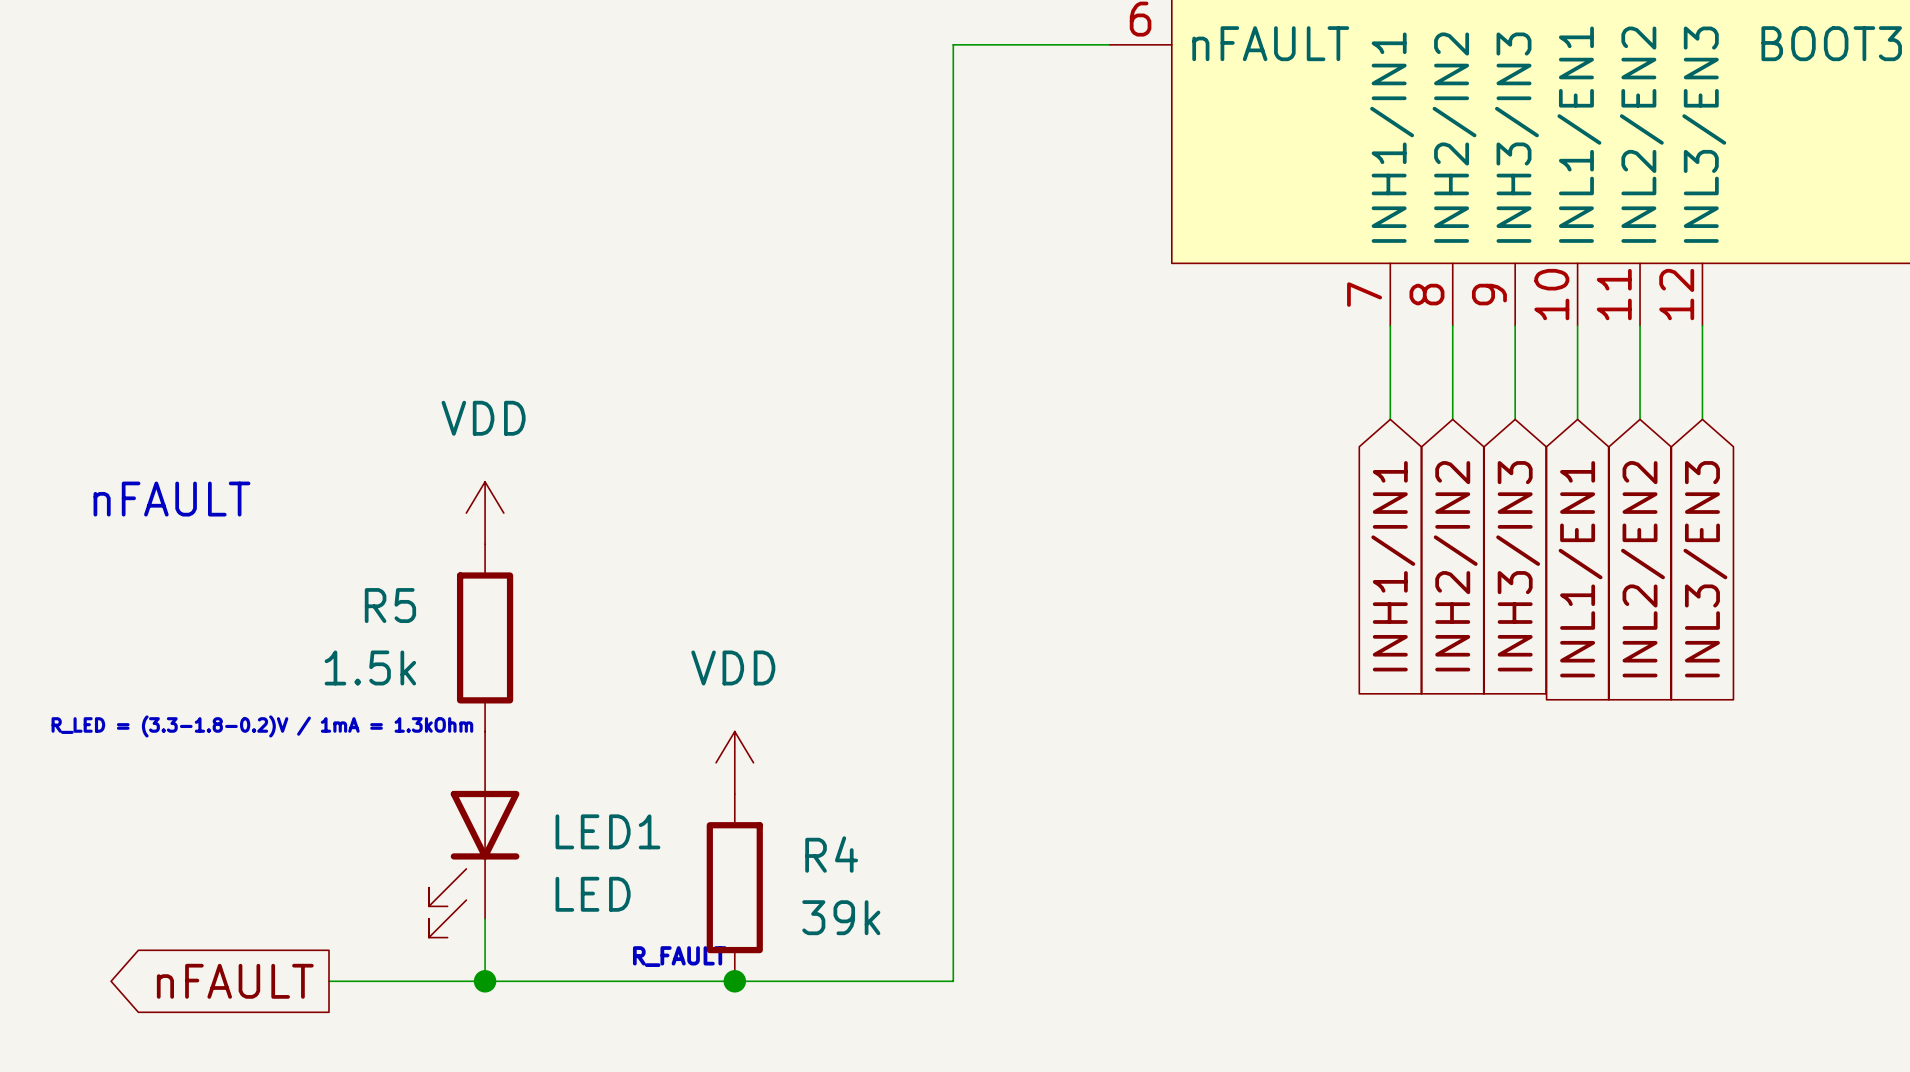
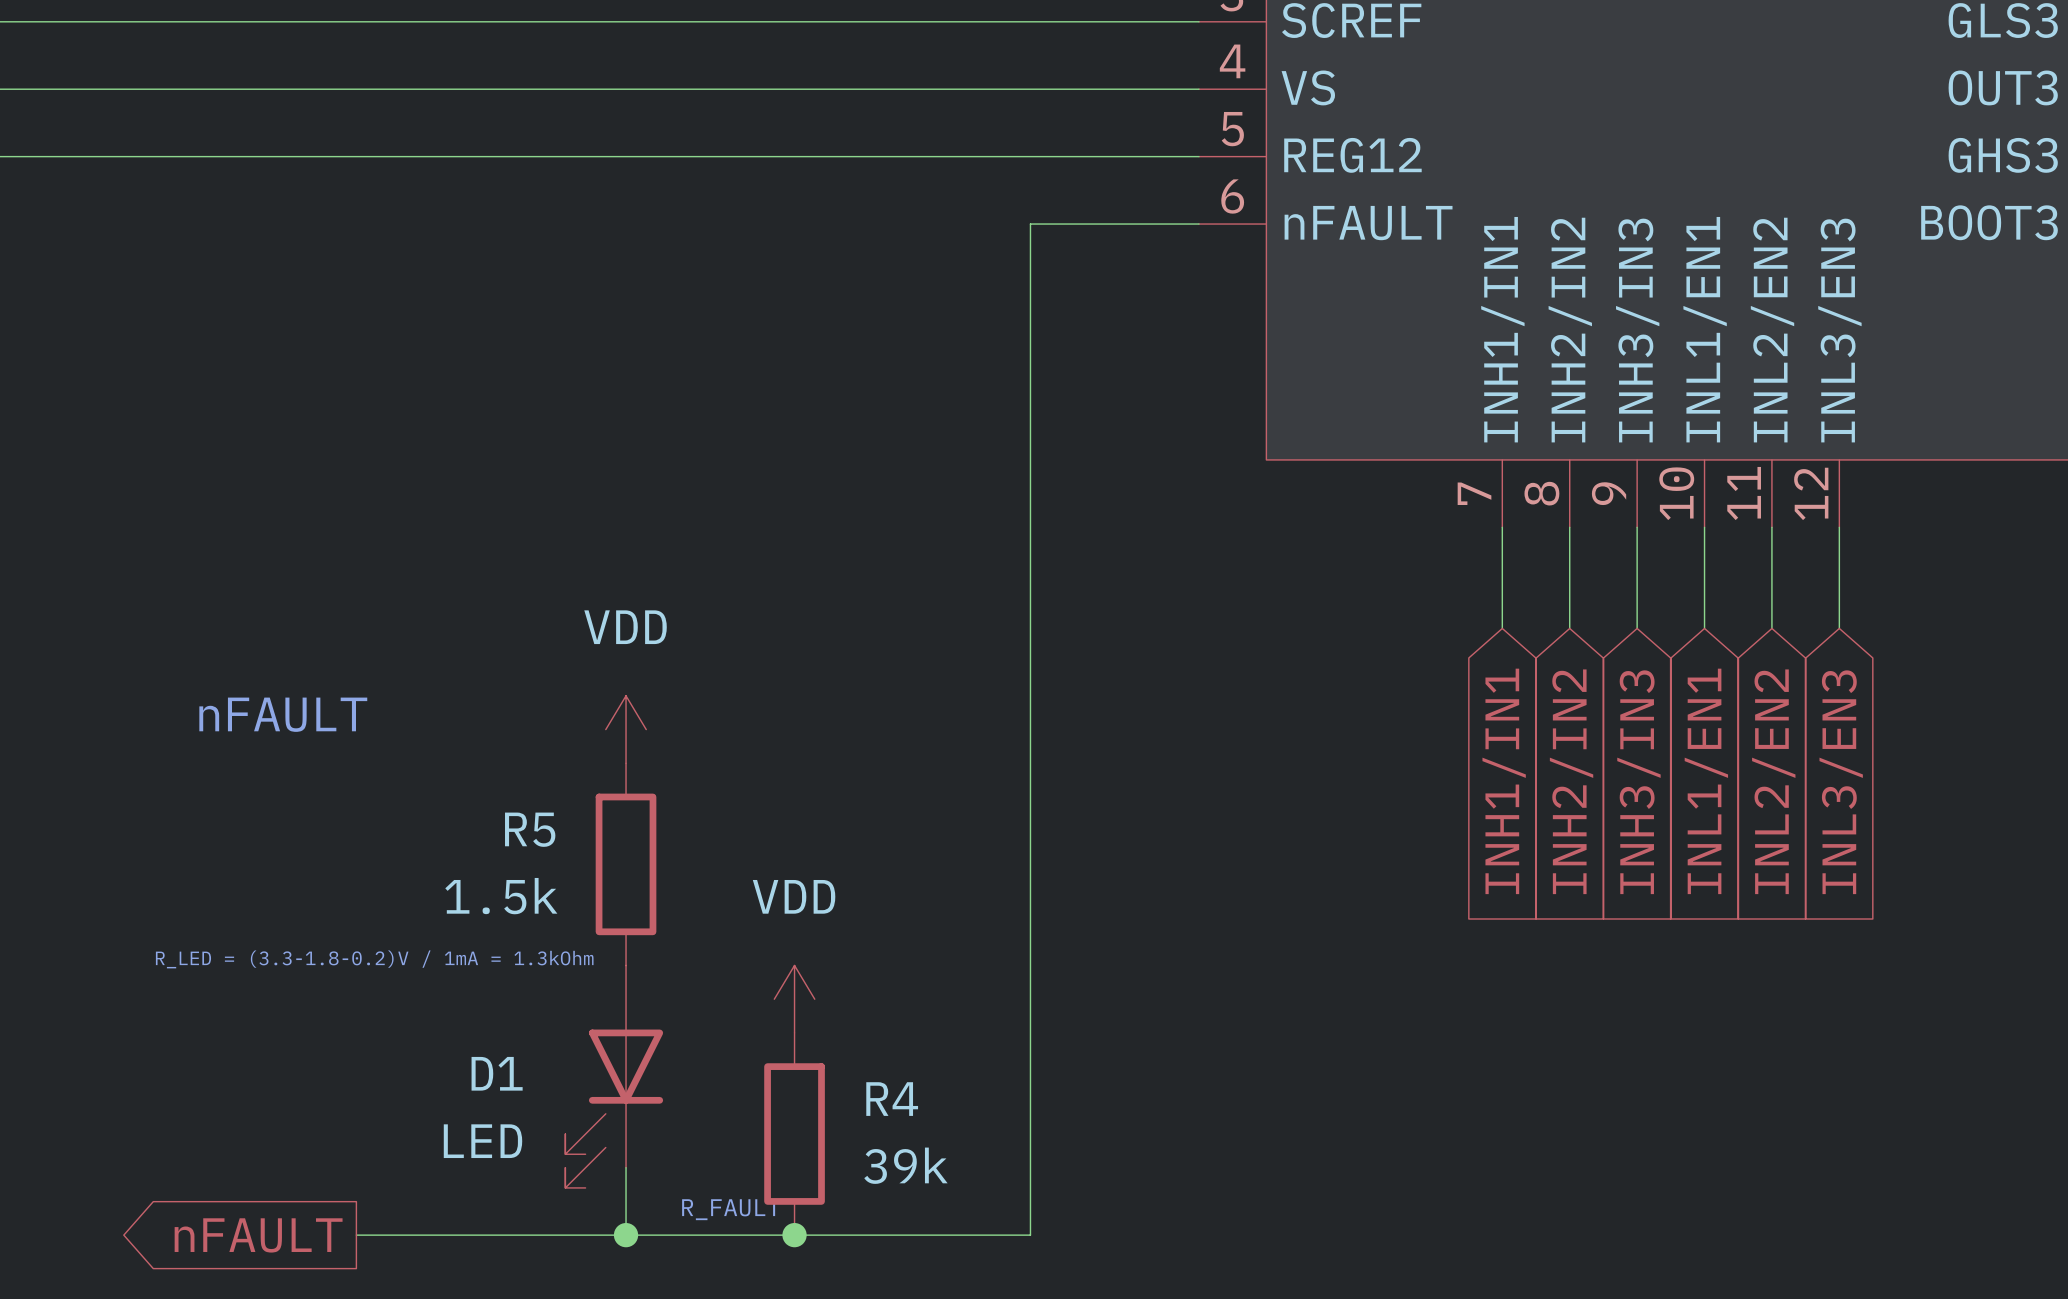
text position: nFAULT (171, 499) -> nFAULT (283, 714)
power symbol position: VDD (485, 513) -> VDD (626, 729)
R5 position: (485, 637) -> (626, 864)
text position: R_LED = (3.3-1.8-0.2)V / 1mA = 1.3kOhm (262, 726) -> R_LED = (3.3-1.8-0.2)V / 1mA = 1.3kOhm (374, 959)
LED1: LED (474, 834) -> none
D1: none -> LED (614, 1076)
wire: (485, 918) (485, 981) -> (626, 1167) (626, 1235)
junction position: (485, 981) -> (626, 1235)

